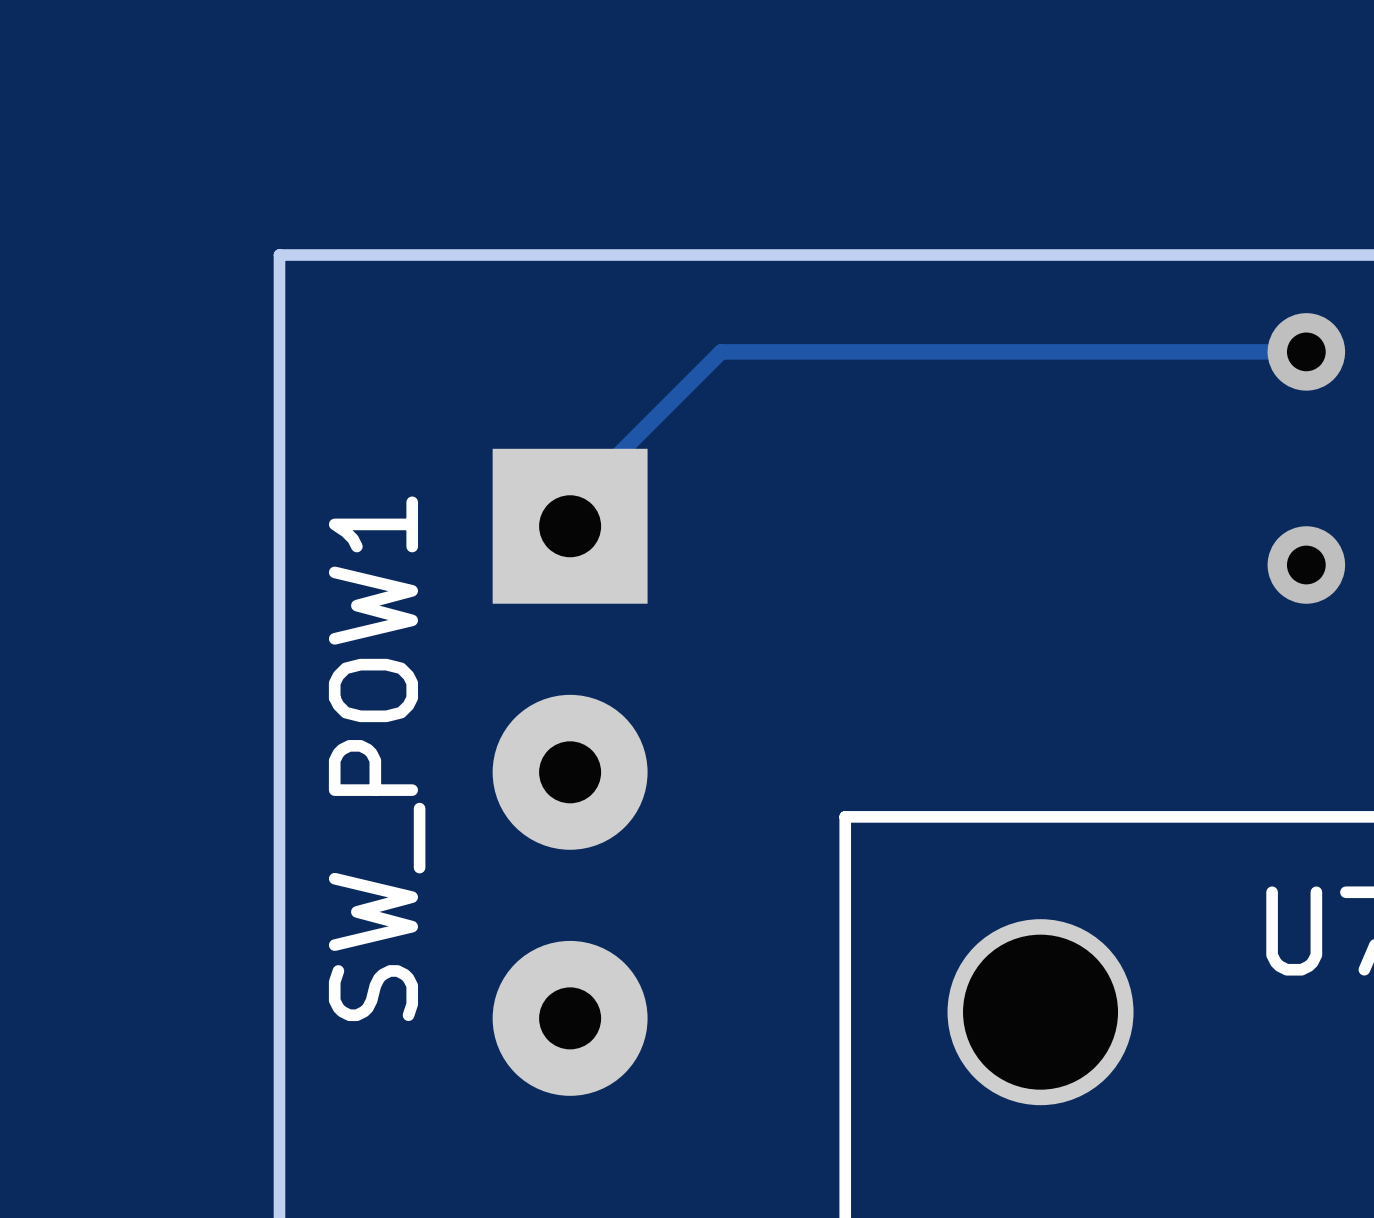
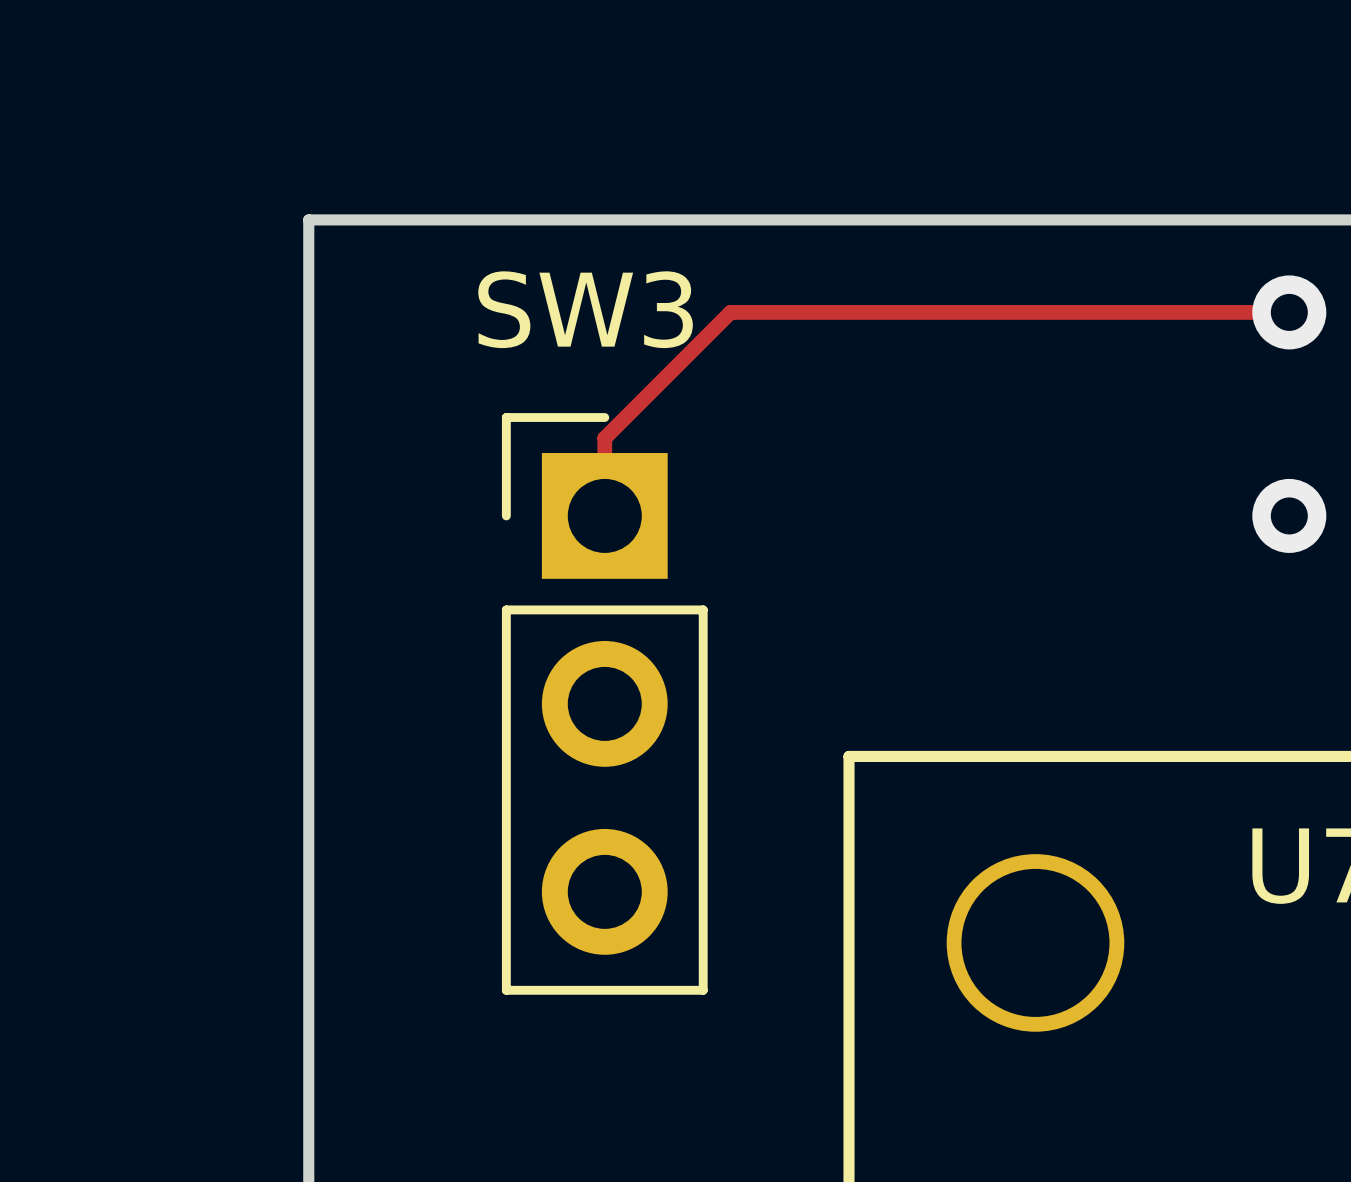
SW3: none -> (604, 703)
SW_POW1: (570, 772) -> none

